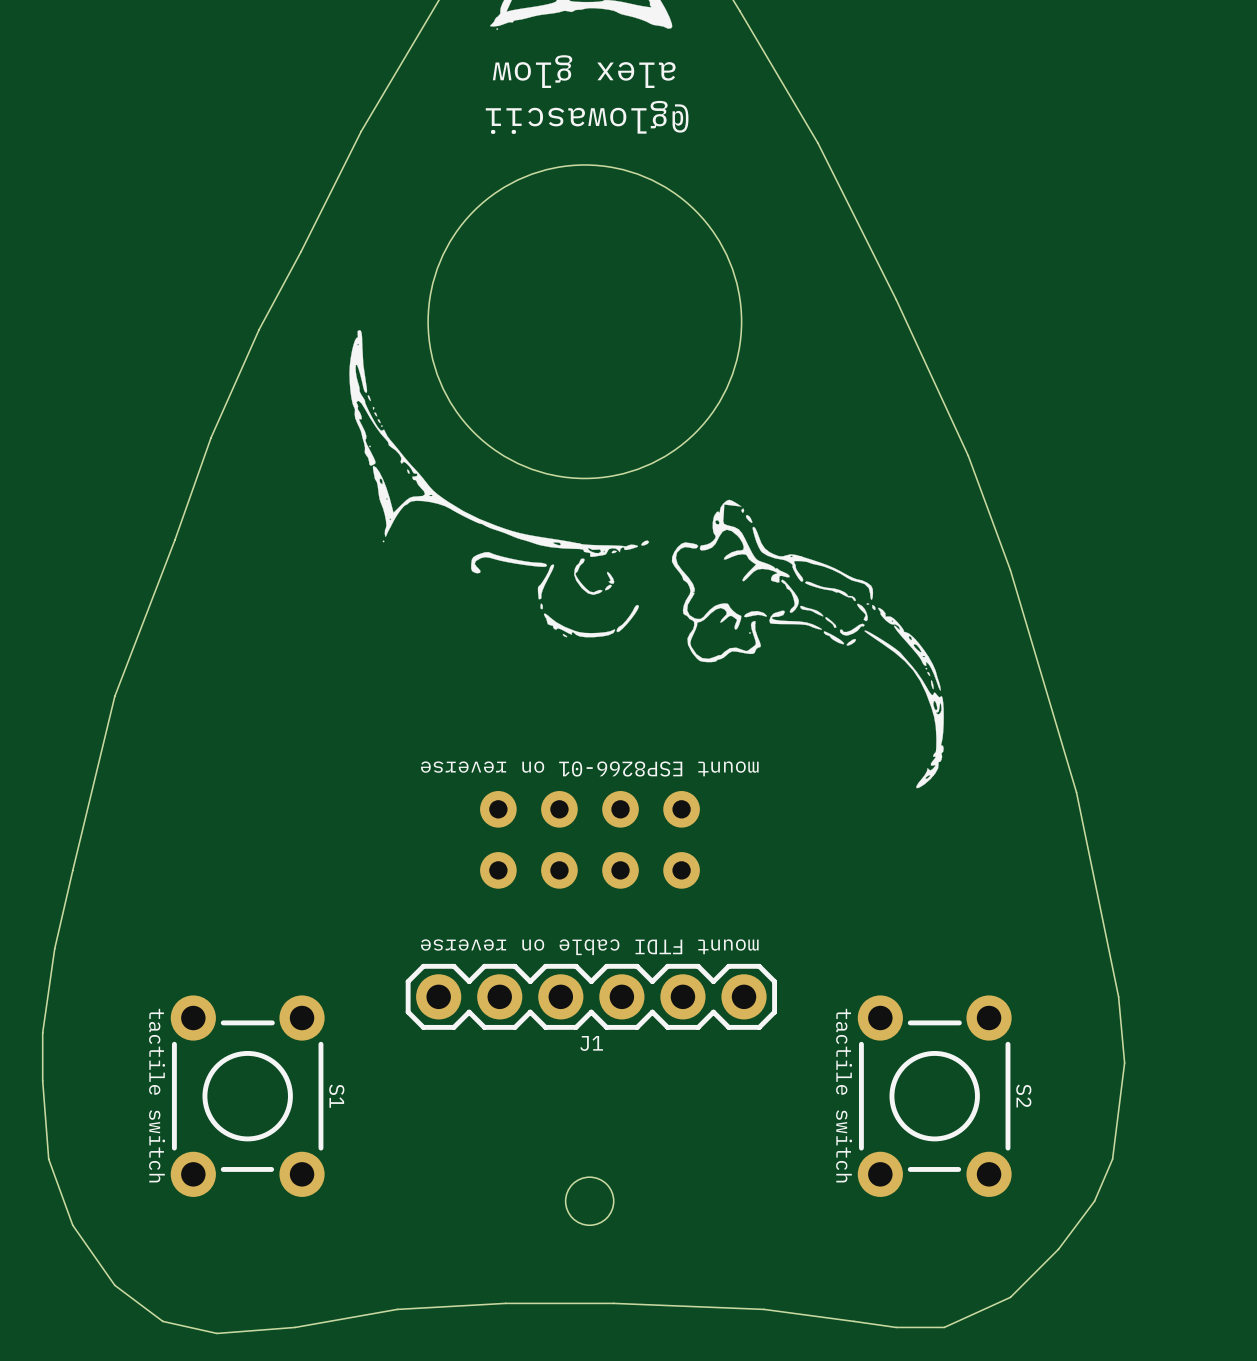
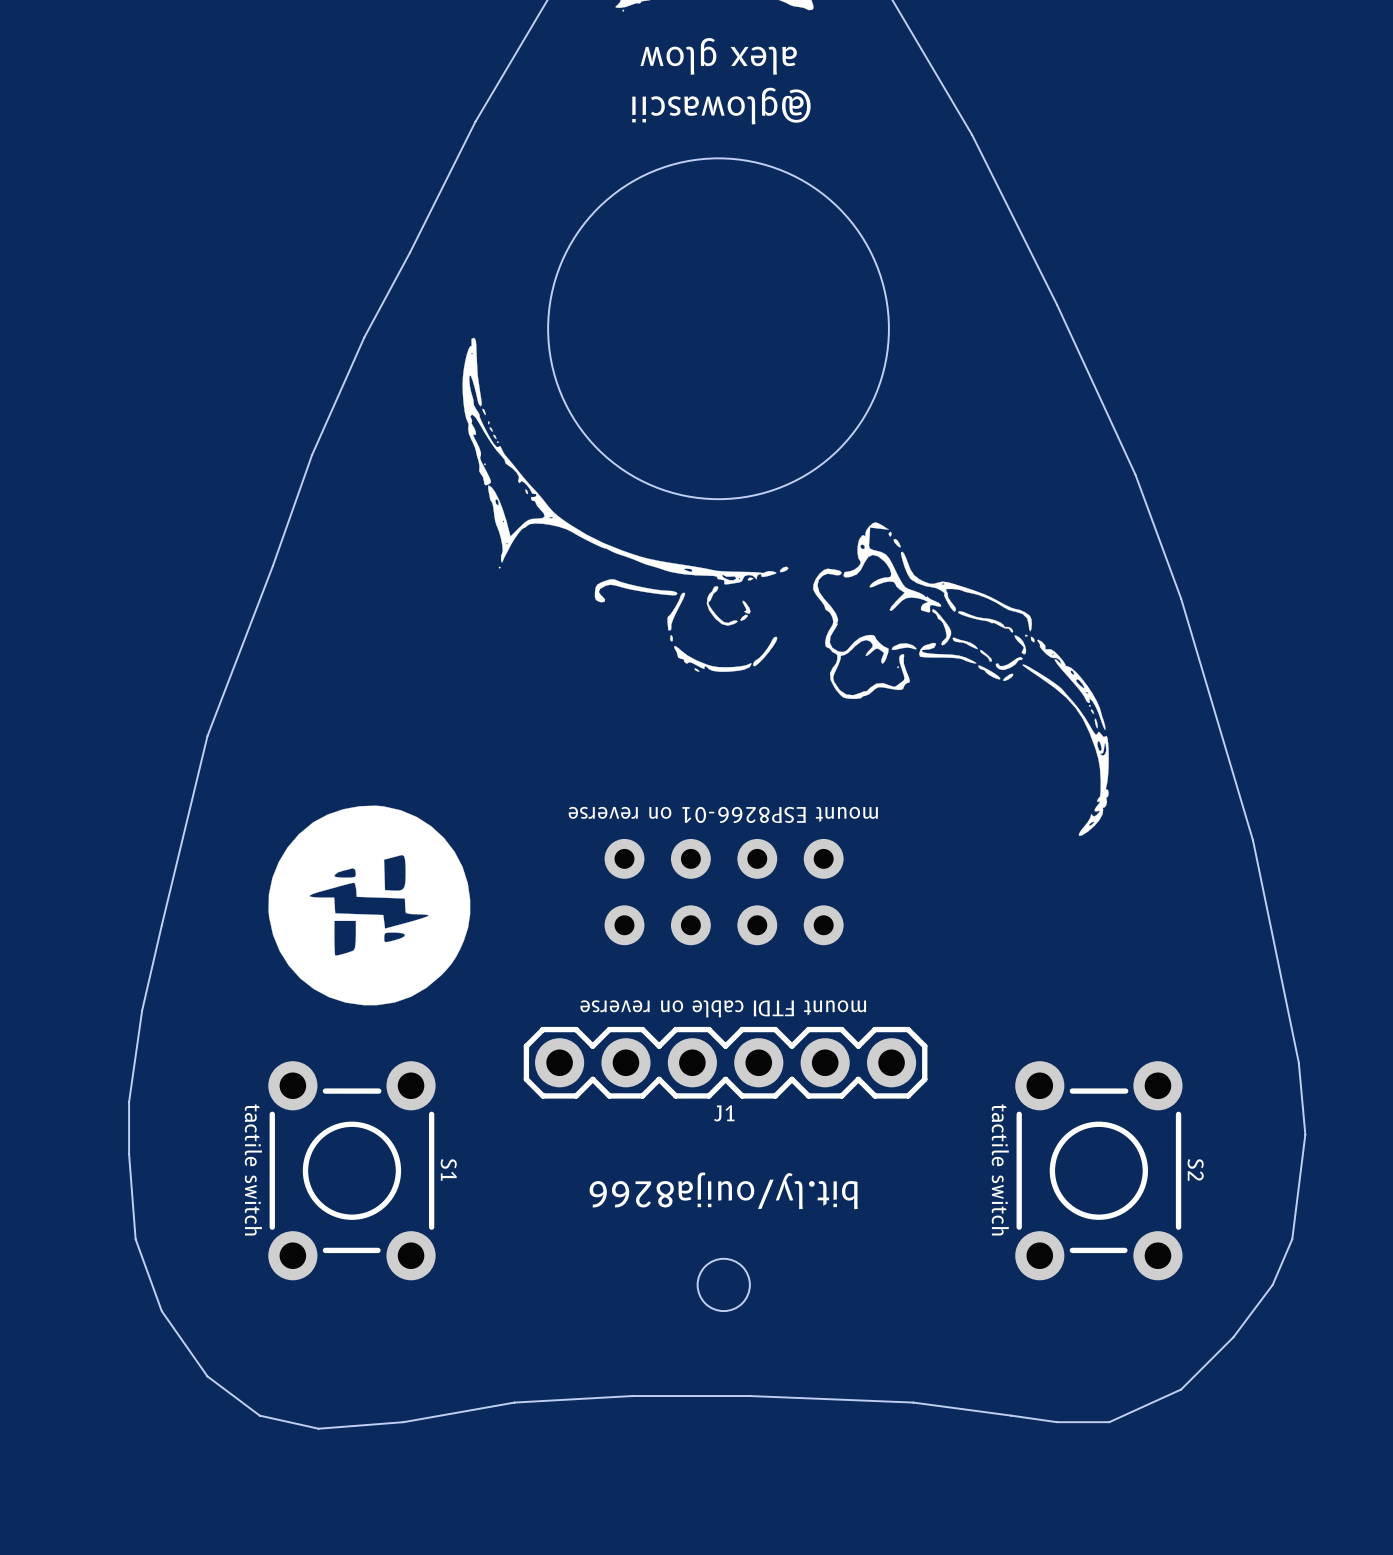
drawing: none -> [268, 805, 471, 1006]
text: none -> bit.ly/ouija8266 (723, 1190)

